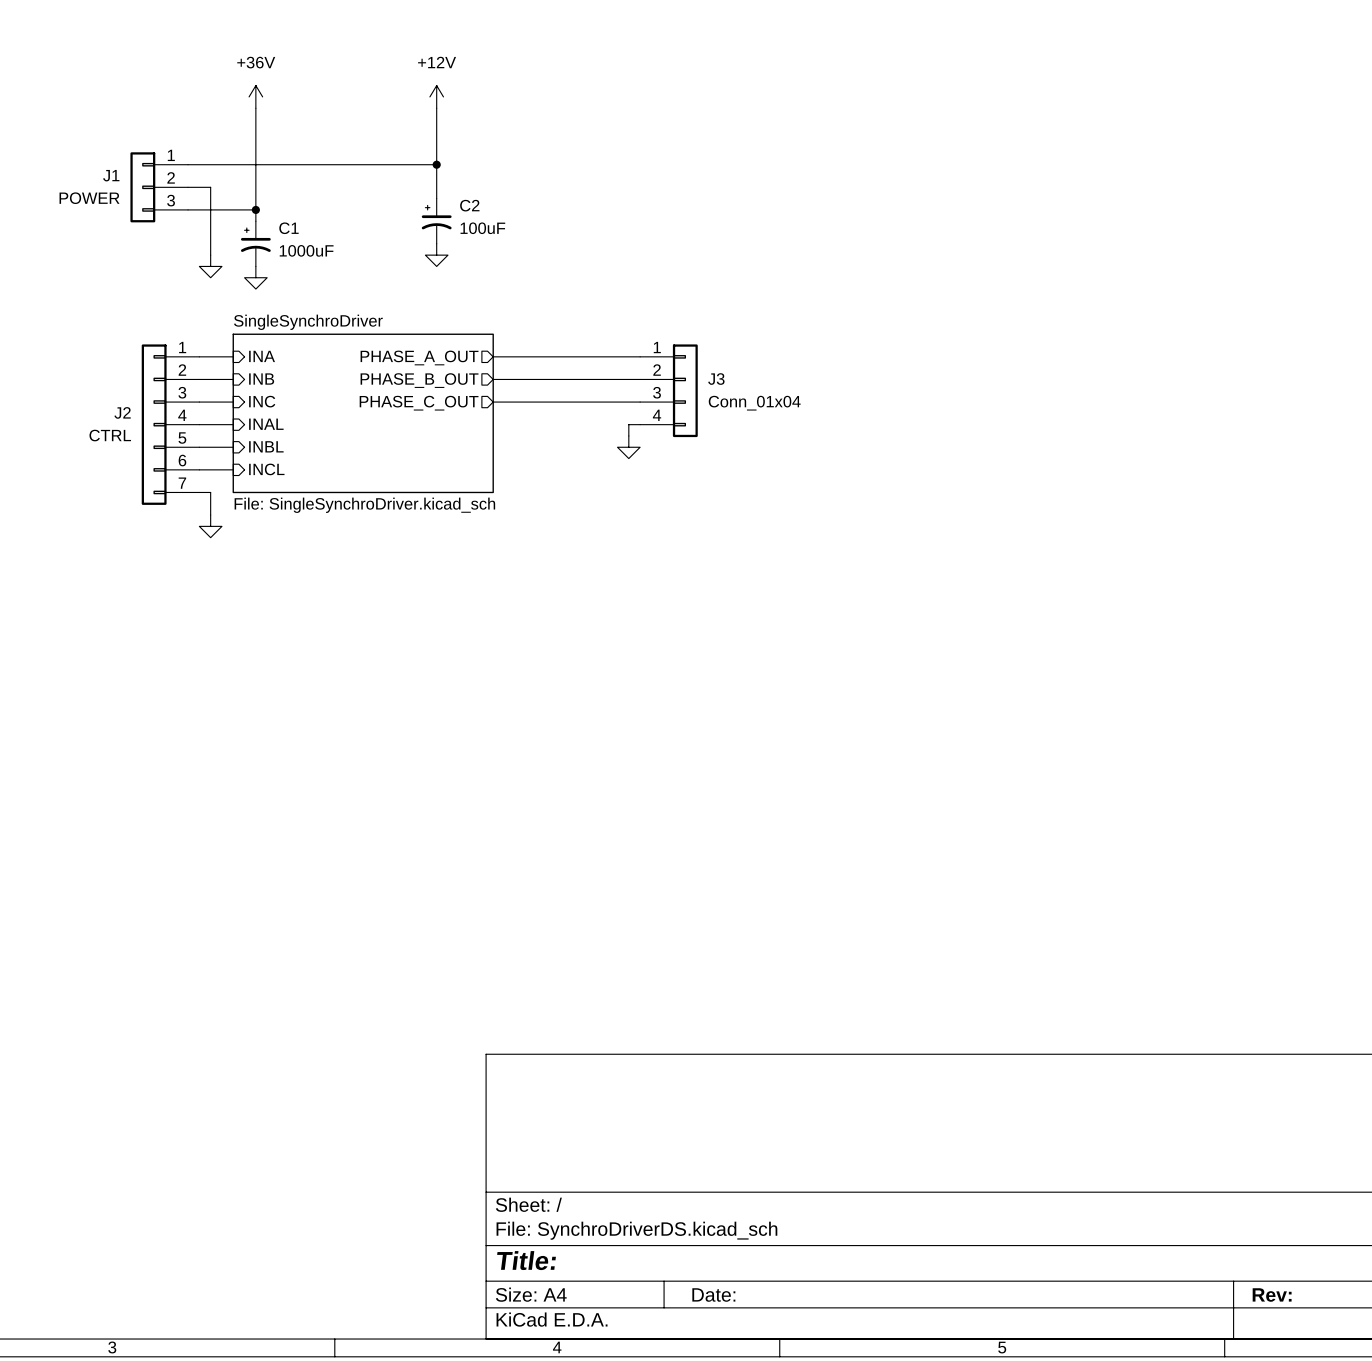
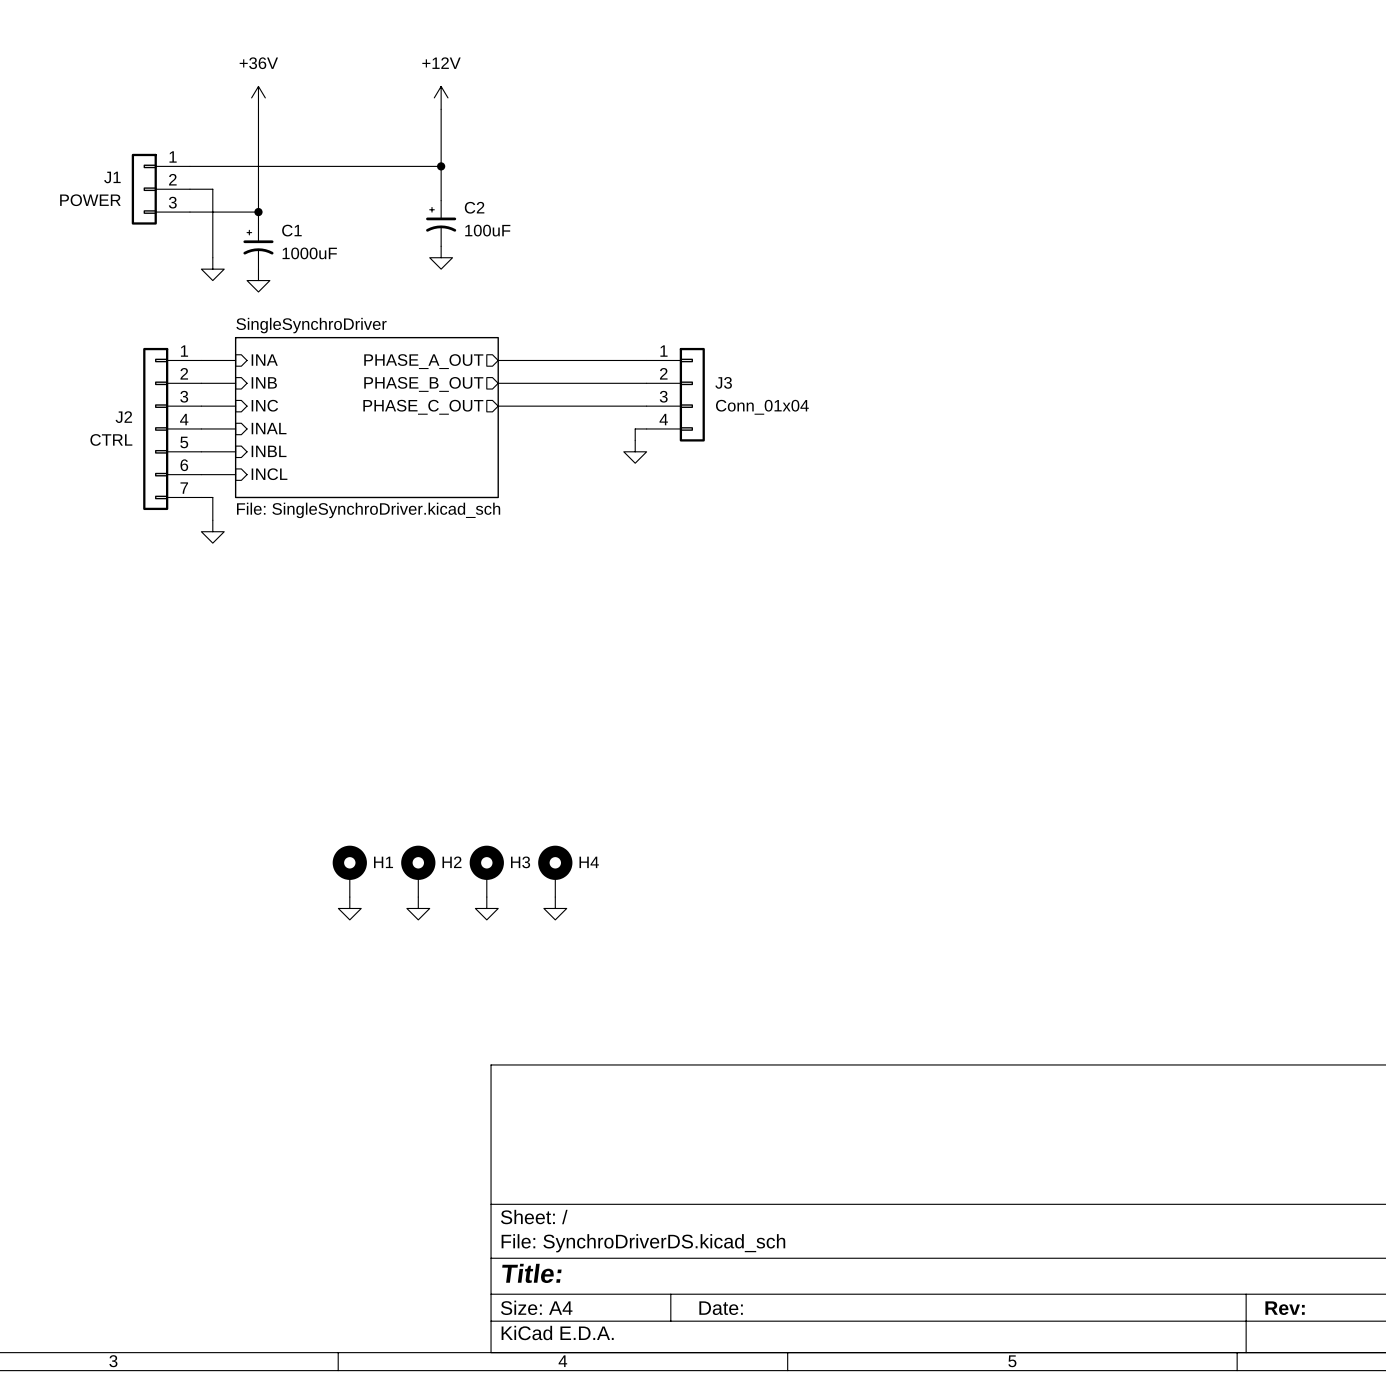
H1: none -> (349, 871)
H2: none -> (418, 871)
H3: none -> (486, 871)
H4: none -> (555, 871)
power symbol: none -> (349, 908)
power symbol: none -> (418, 908)
power symbol: none -> (486, 908)
power symbol: none -> (555, 908)

